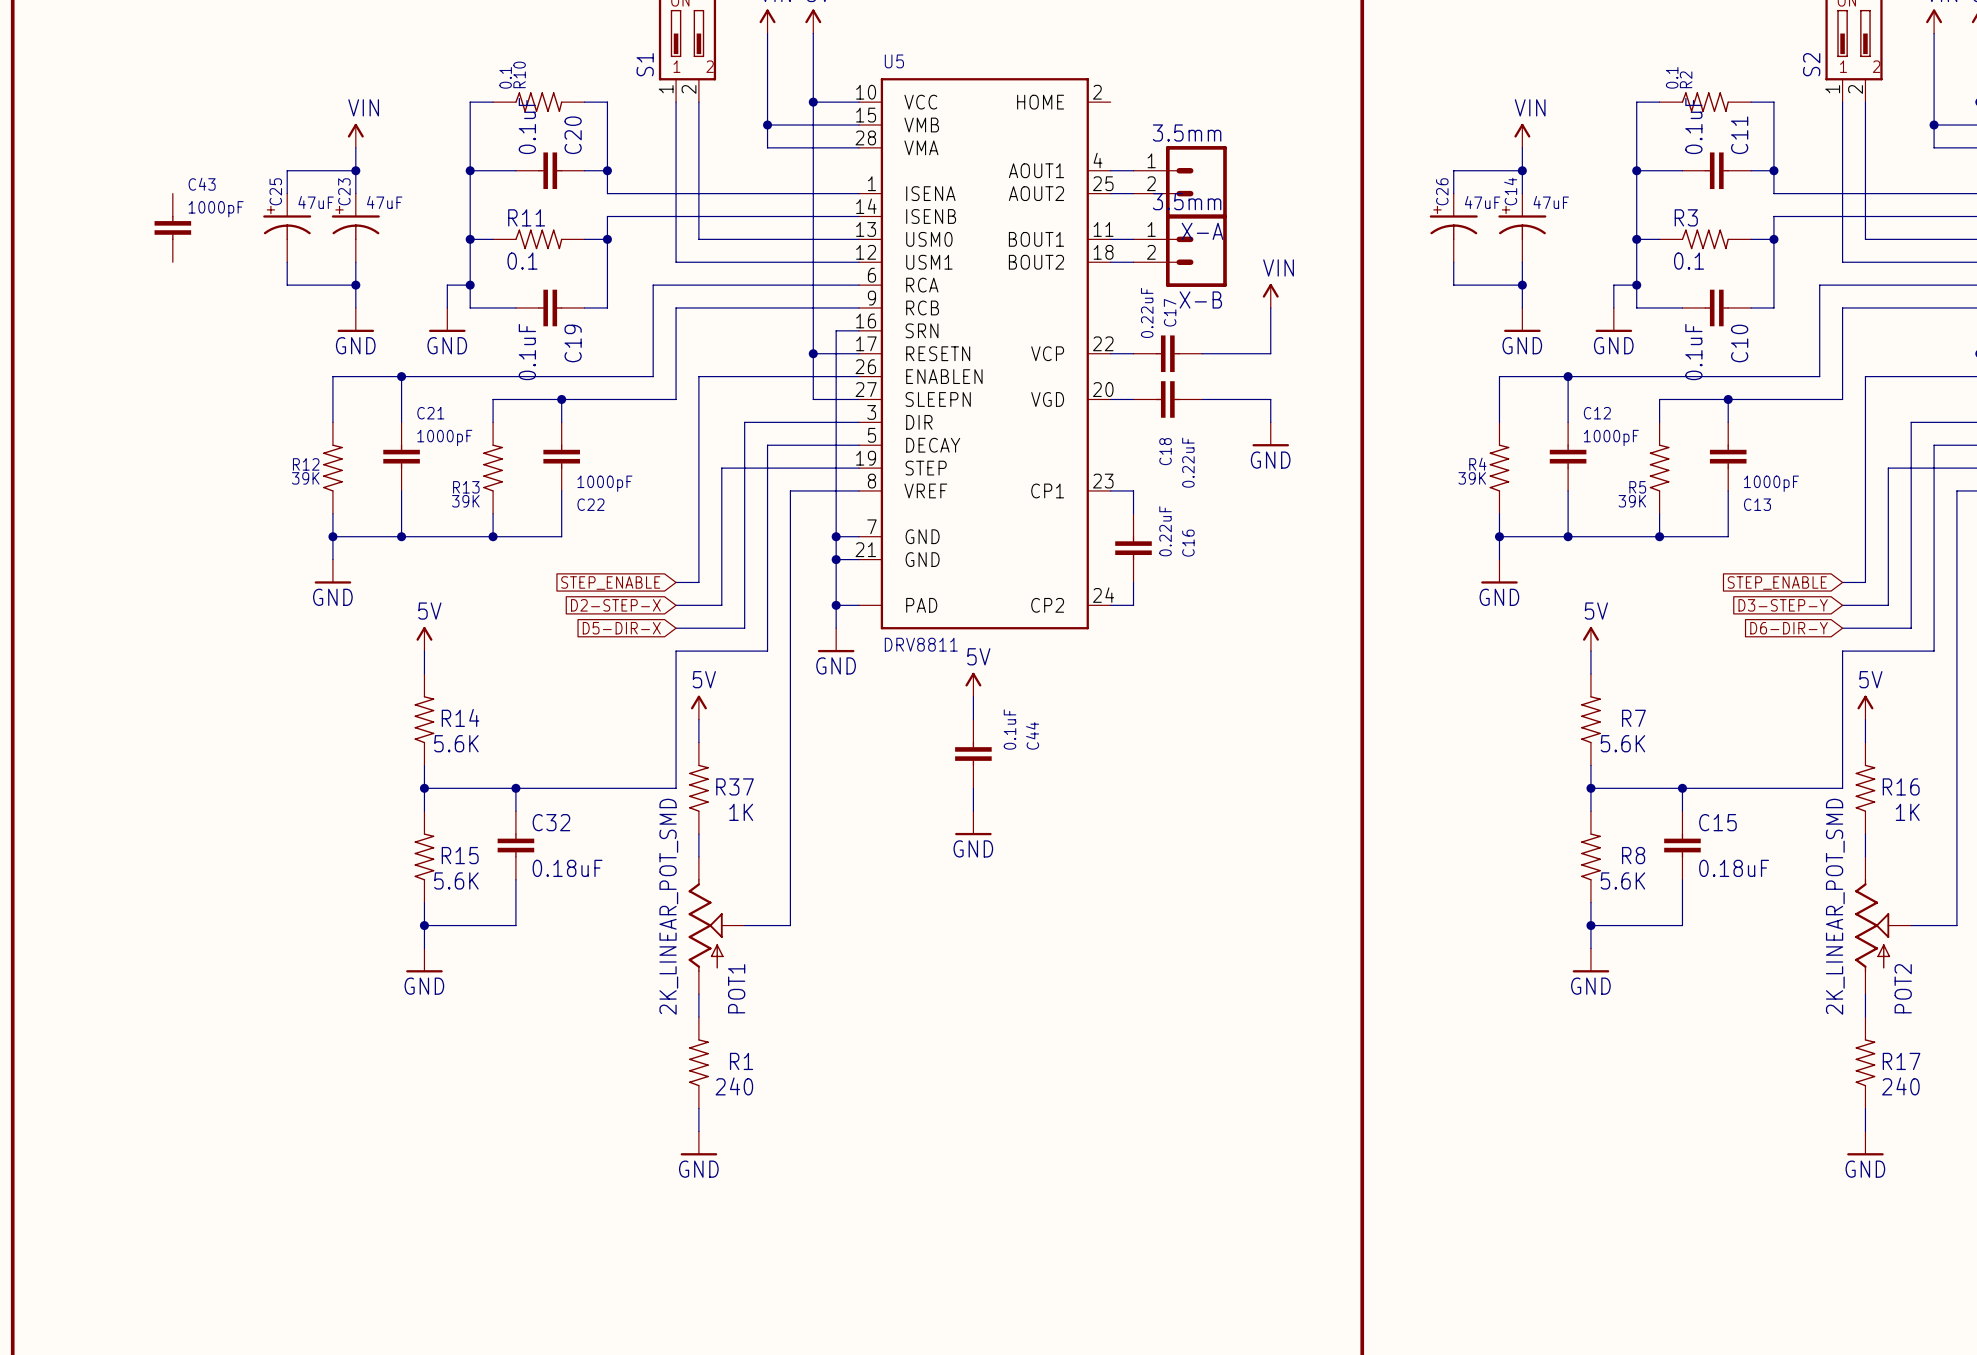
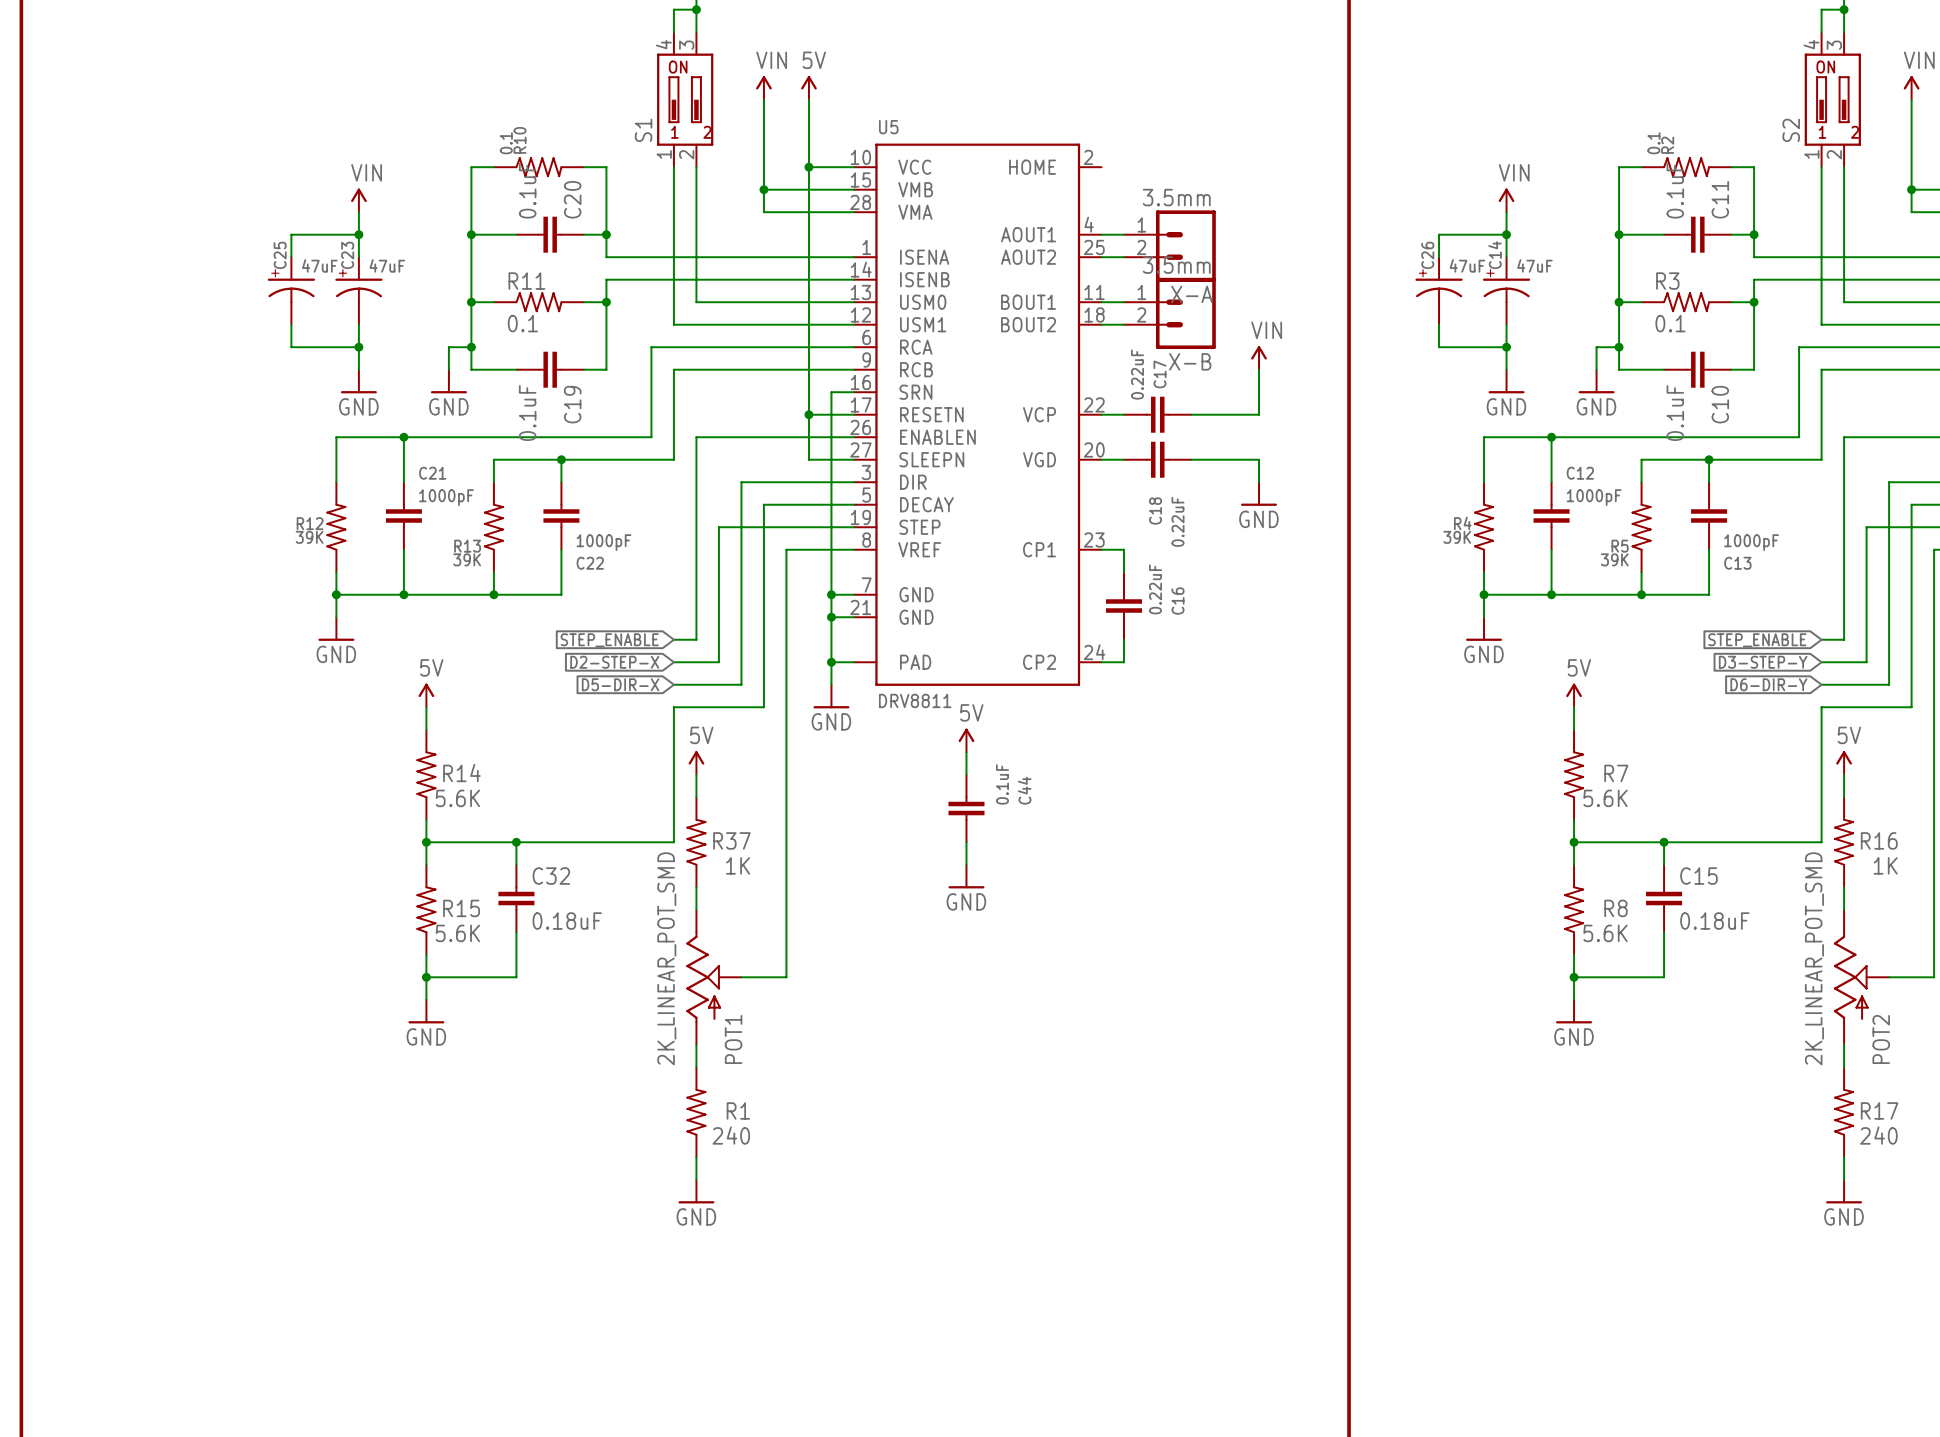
C43: 1000pF (172, 227) -> none

